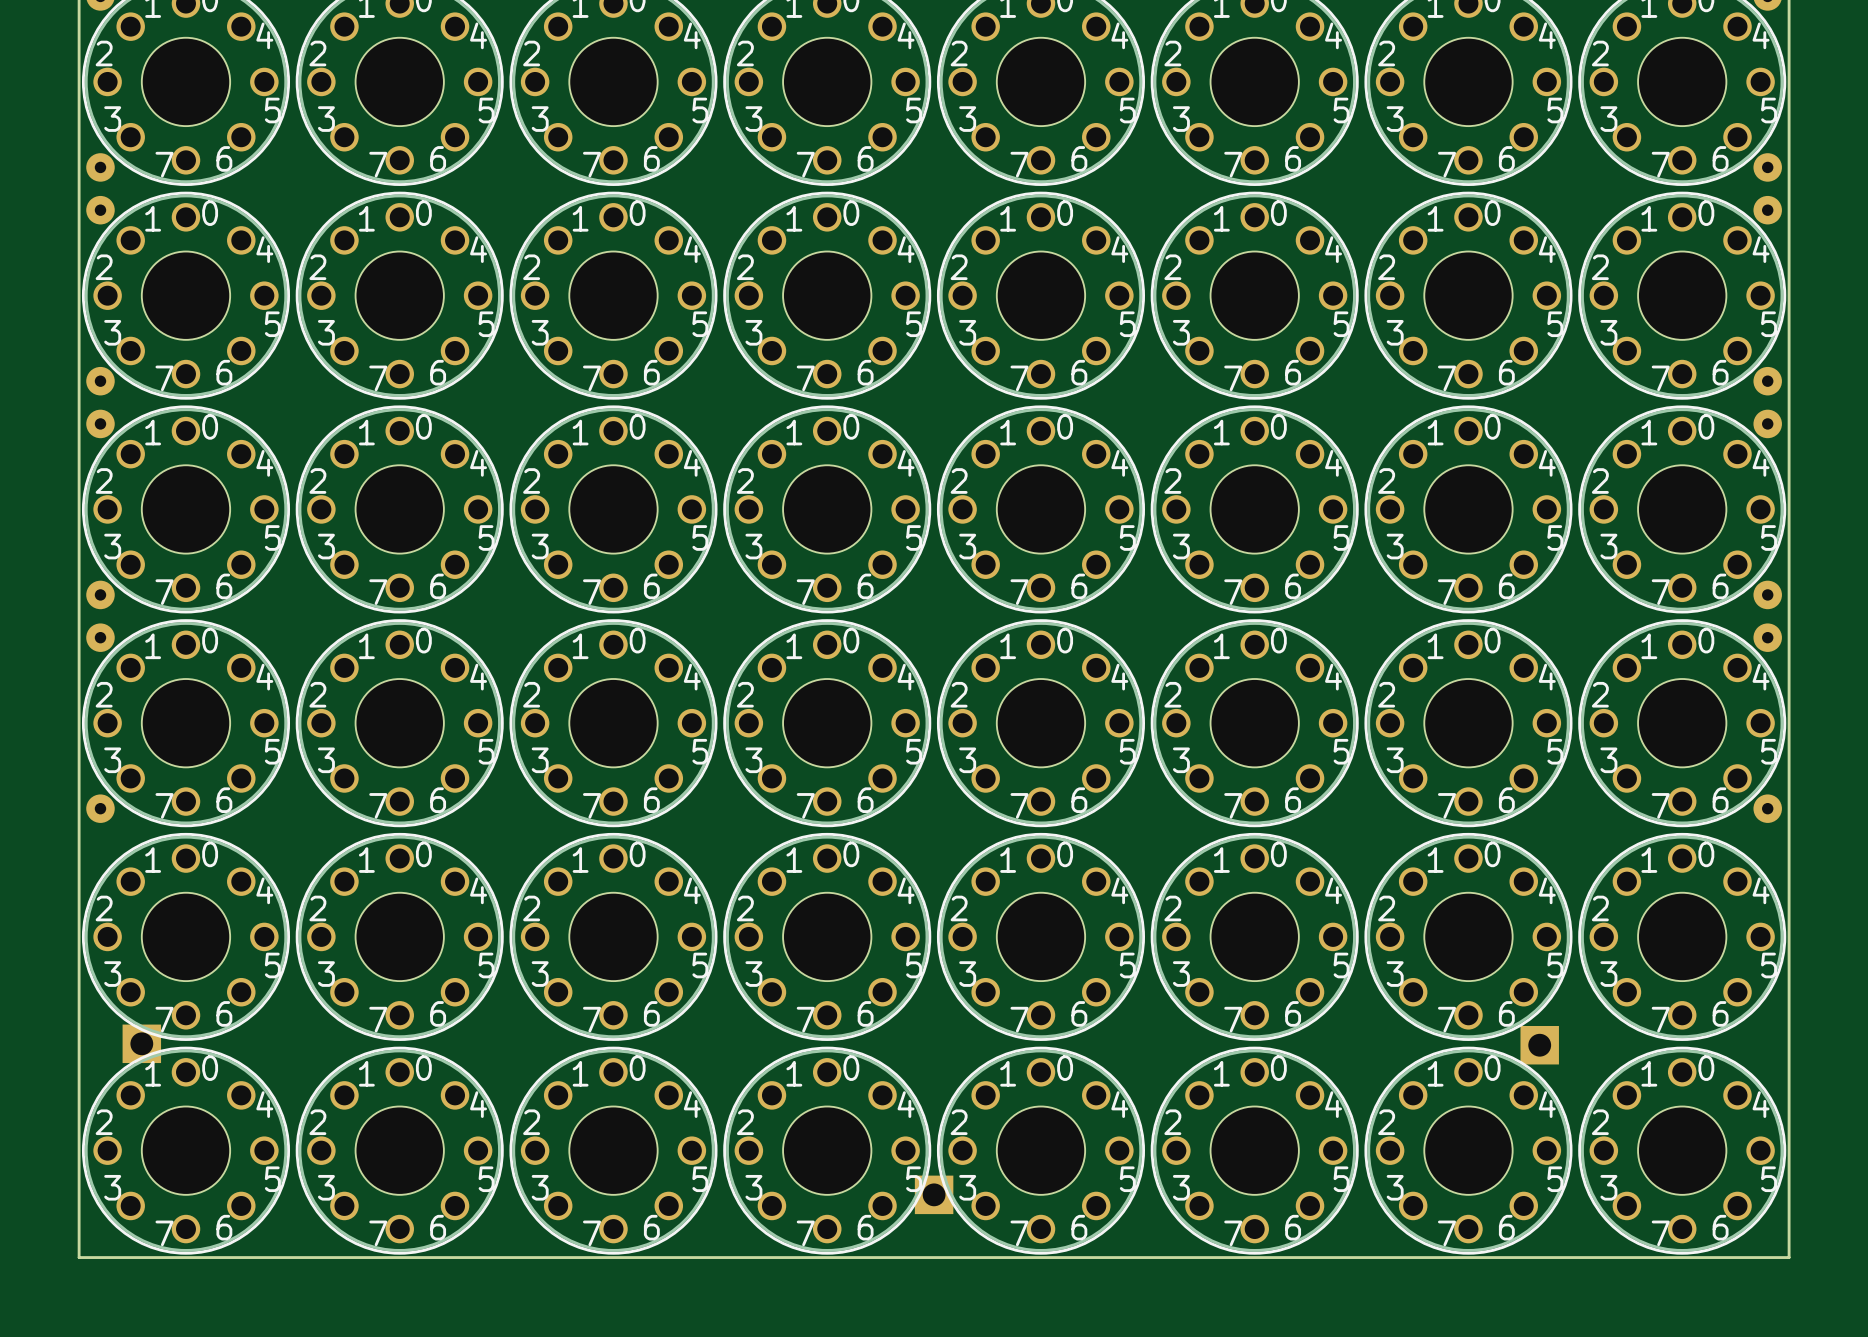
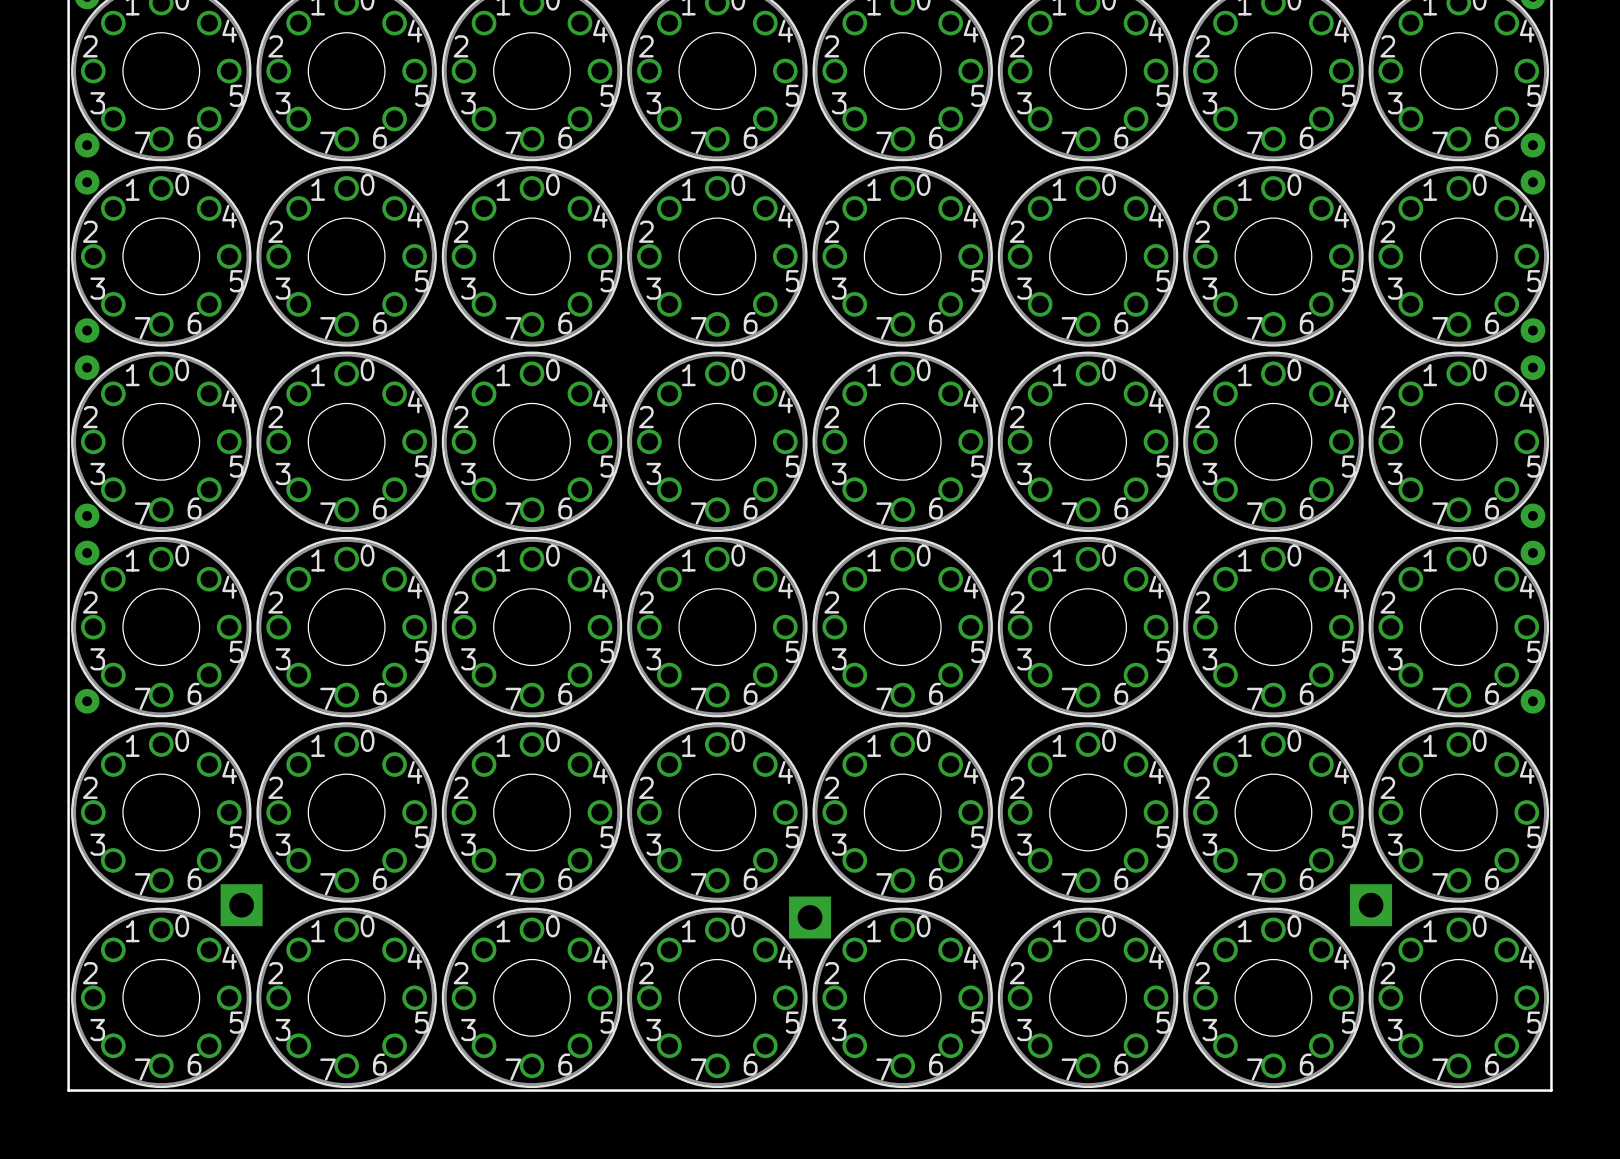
part: (141, 1043) -> none
part: none -> (241, 905)
part: none -> (1371, 905)
part: (1539, 1045) -> none
part: none -> (810, 917)
part: (934, 1194) -> none

